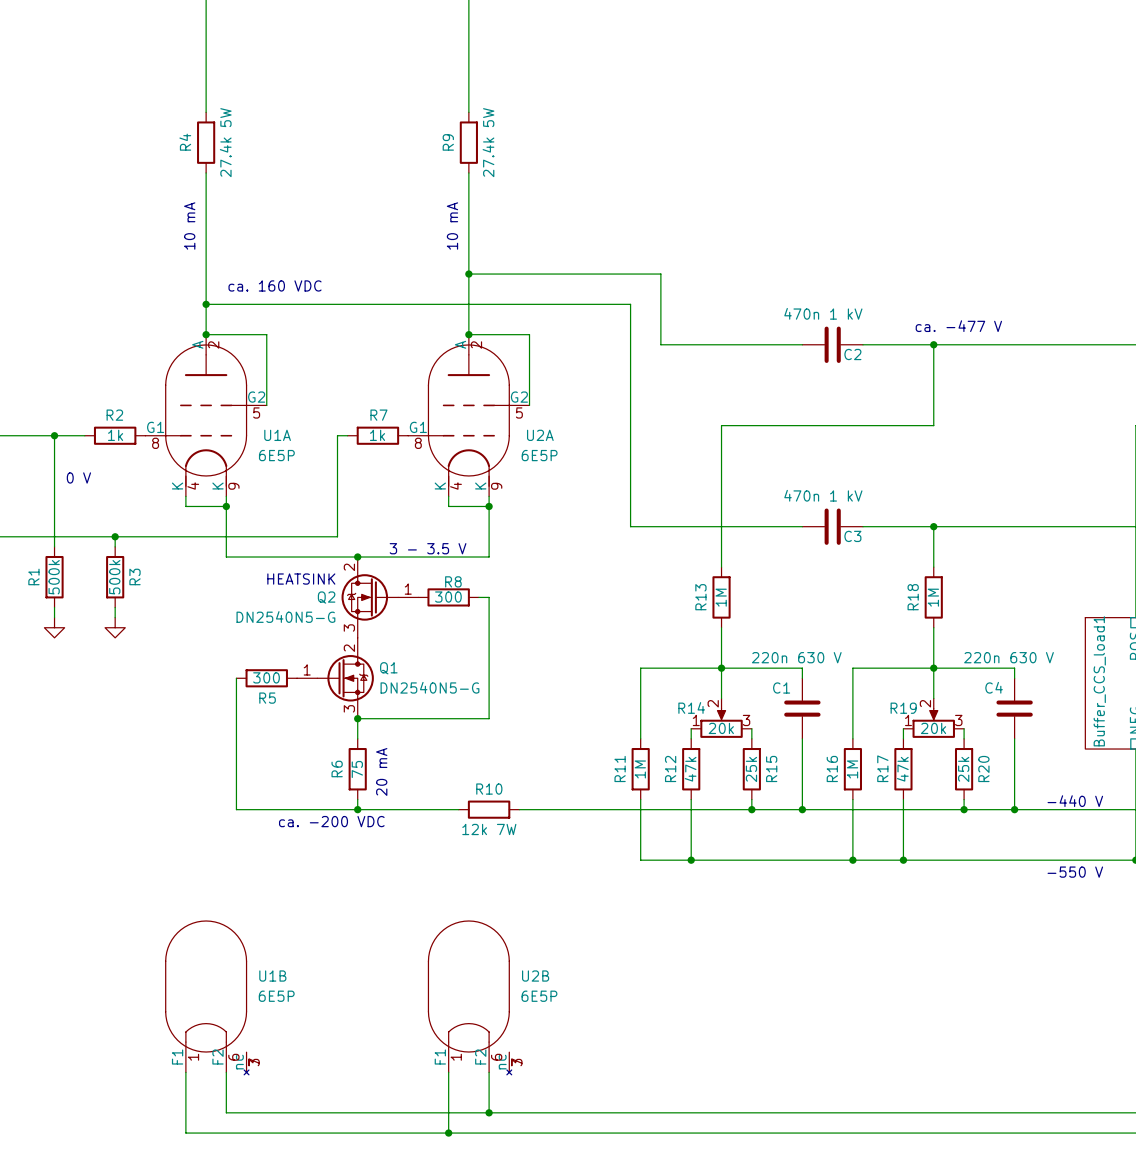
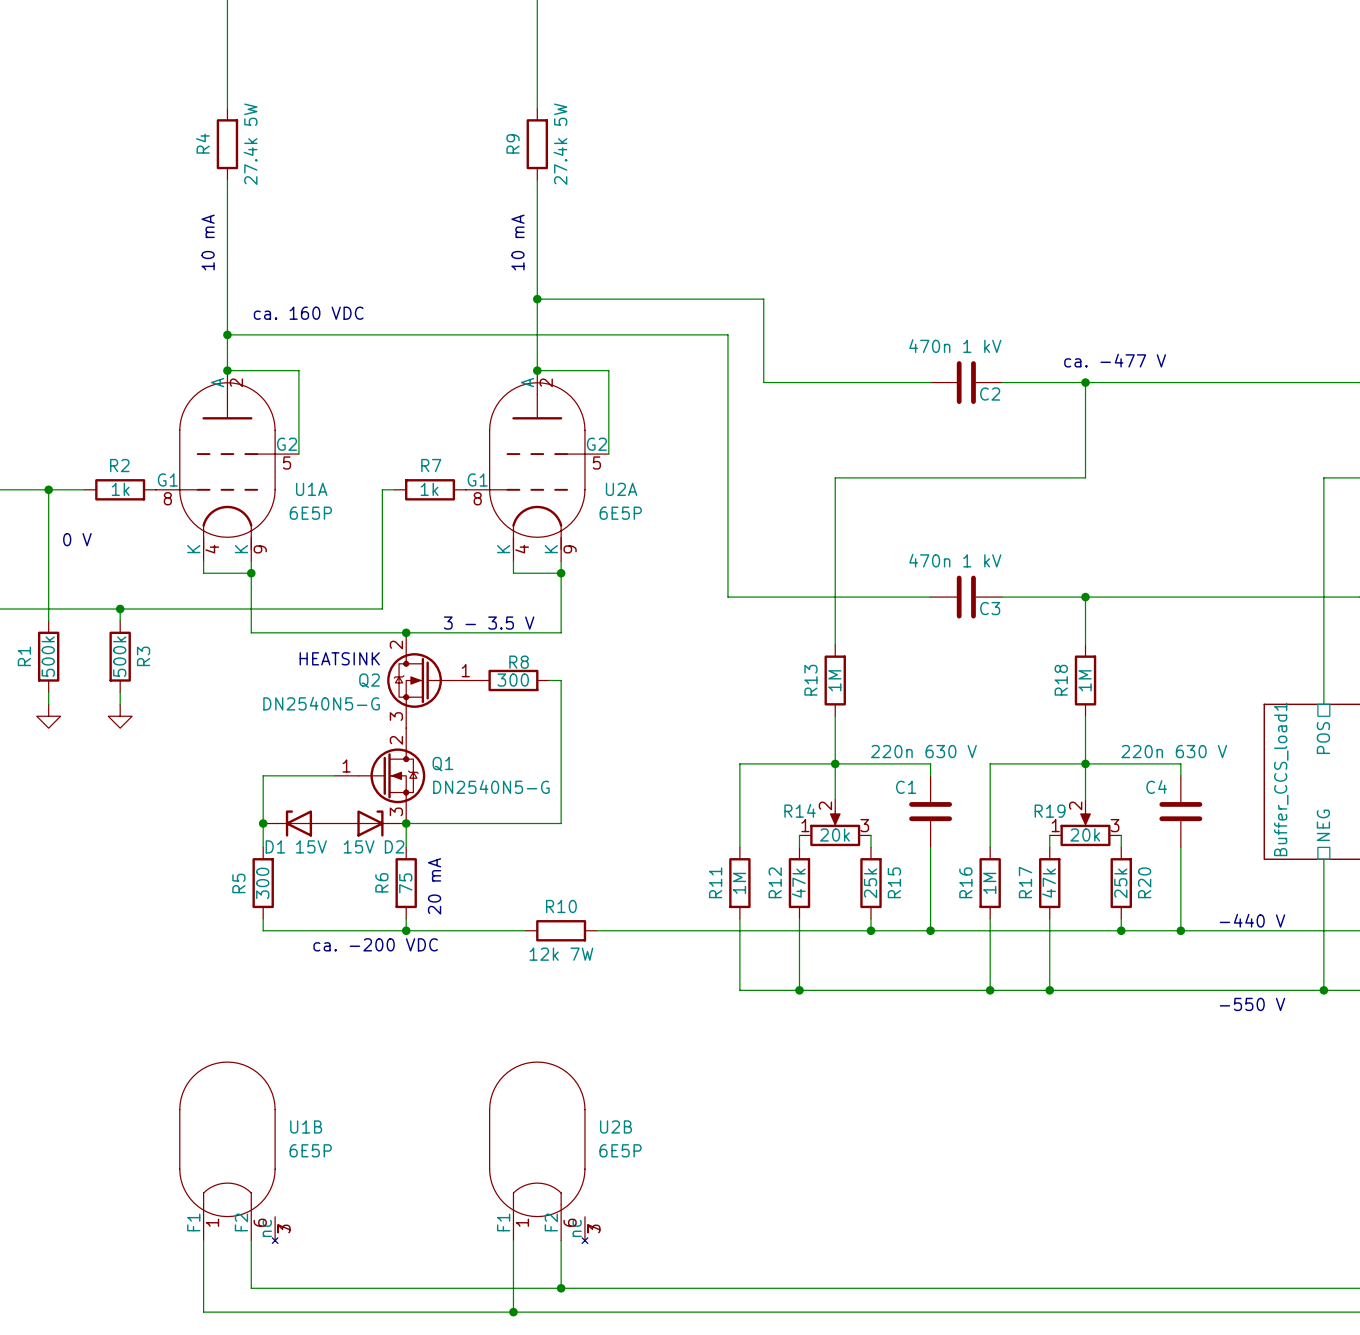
wire: none -> (263, 775) (334, 775)
R5 rotation: 0° (266, 678) -> 90° clockwise (263, 883)
R5 position: (266, 678) -> (263, 883)
junction: none -> (263, 823)
D1: none -> 15V (298, 823)
D2: none -> 15V (370, 823)
wire: (236, 738) (236, 799) -> none

